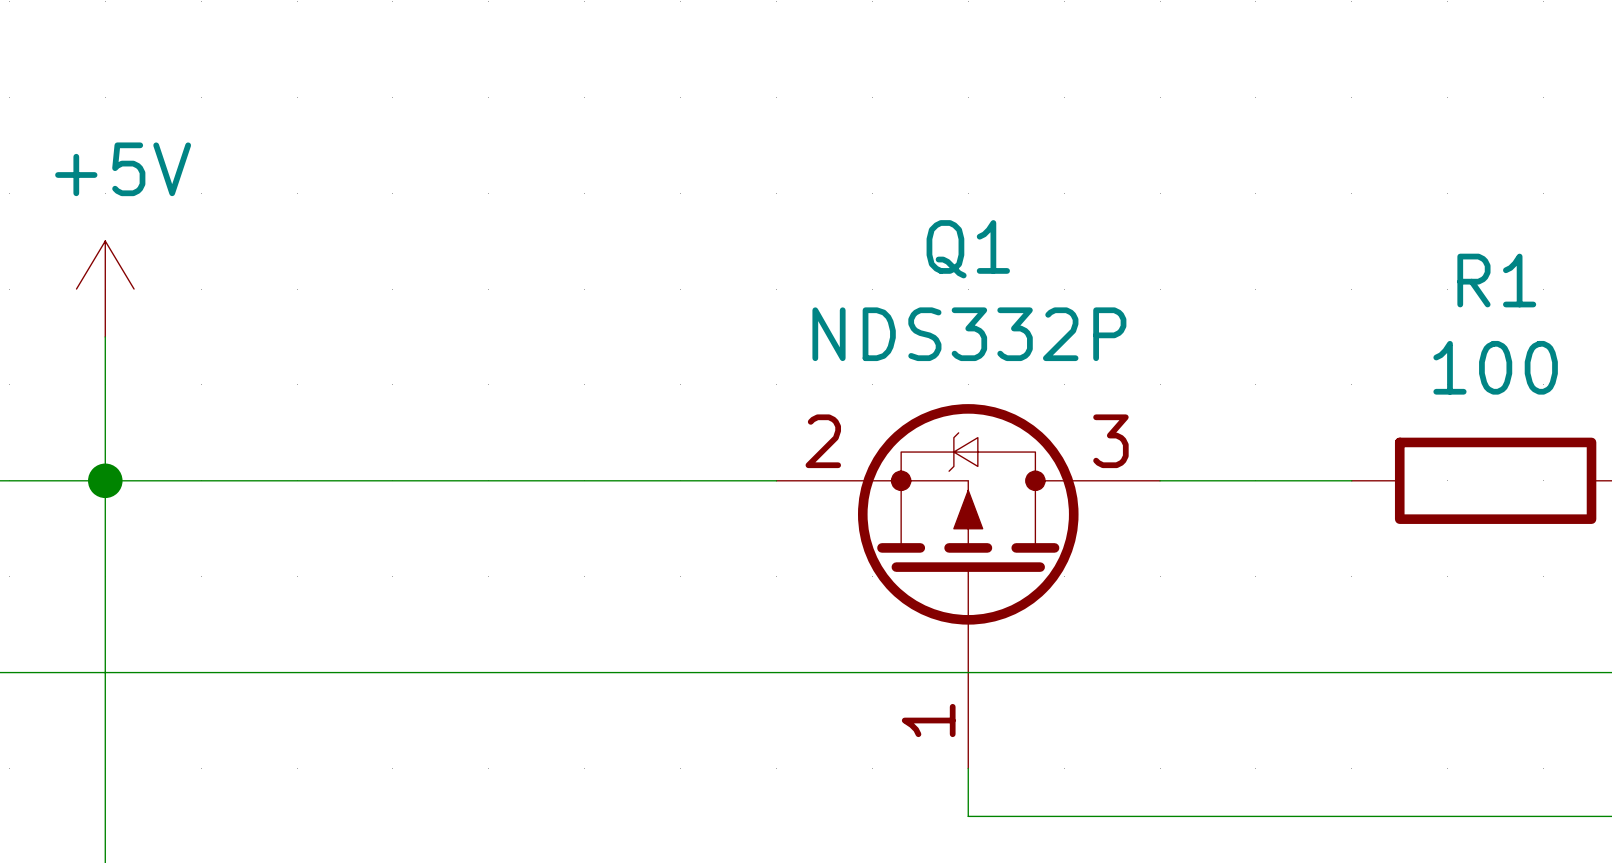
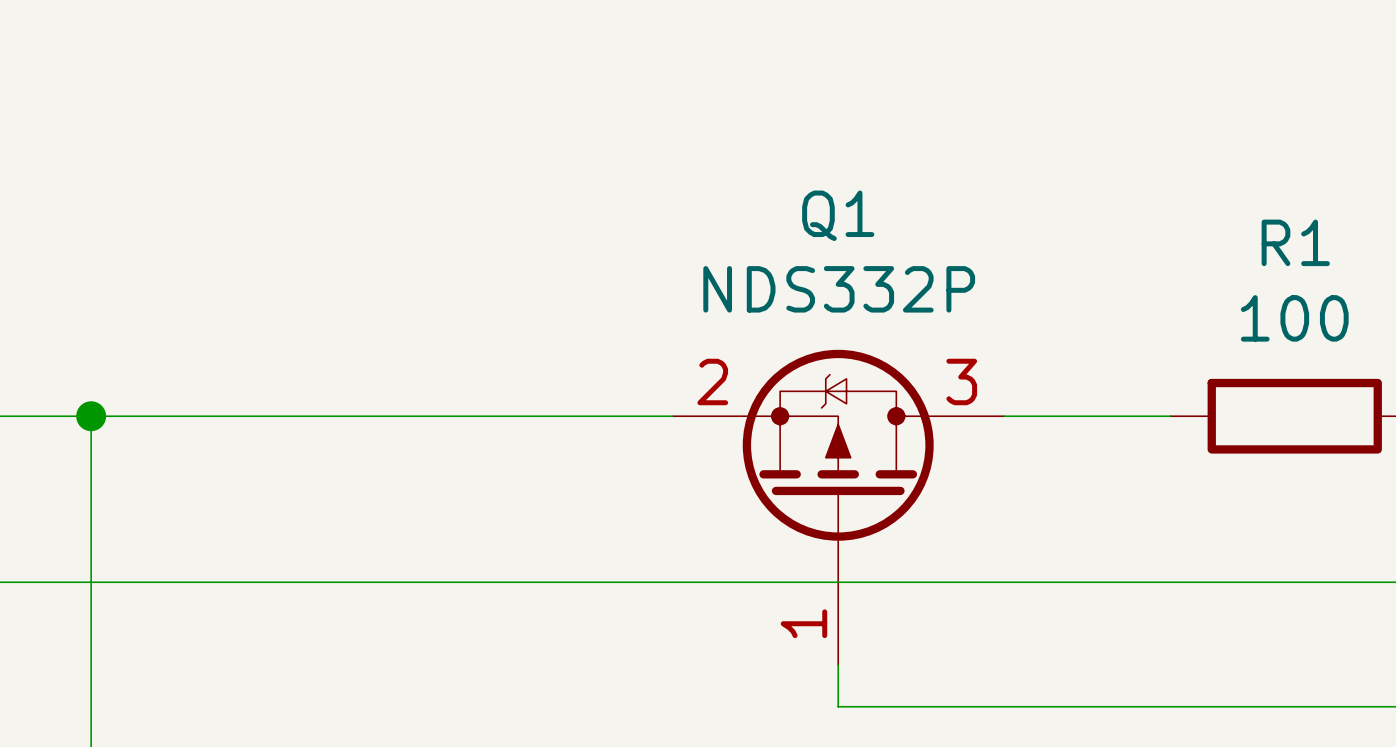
power symbol: +5V (105, 289) -> none
wire: (105, 336) (105, 480) -> none

